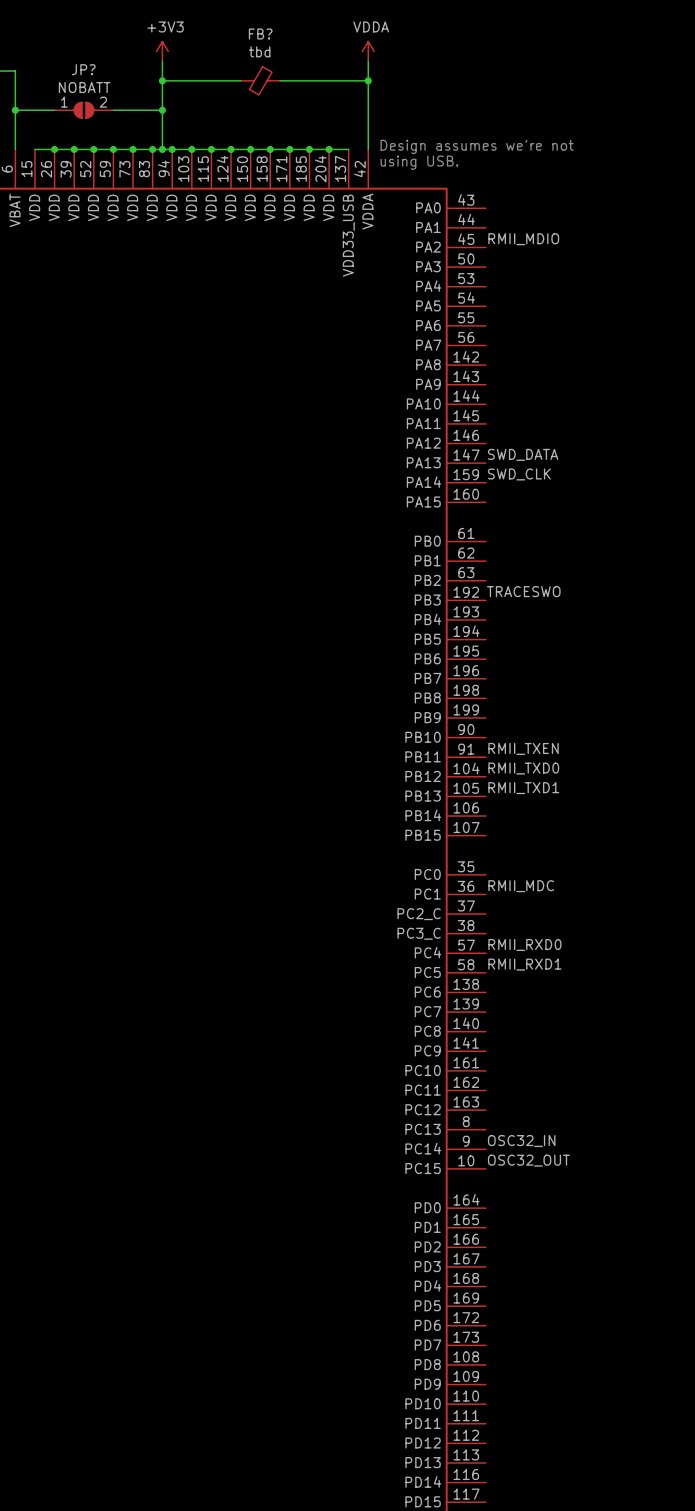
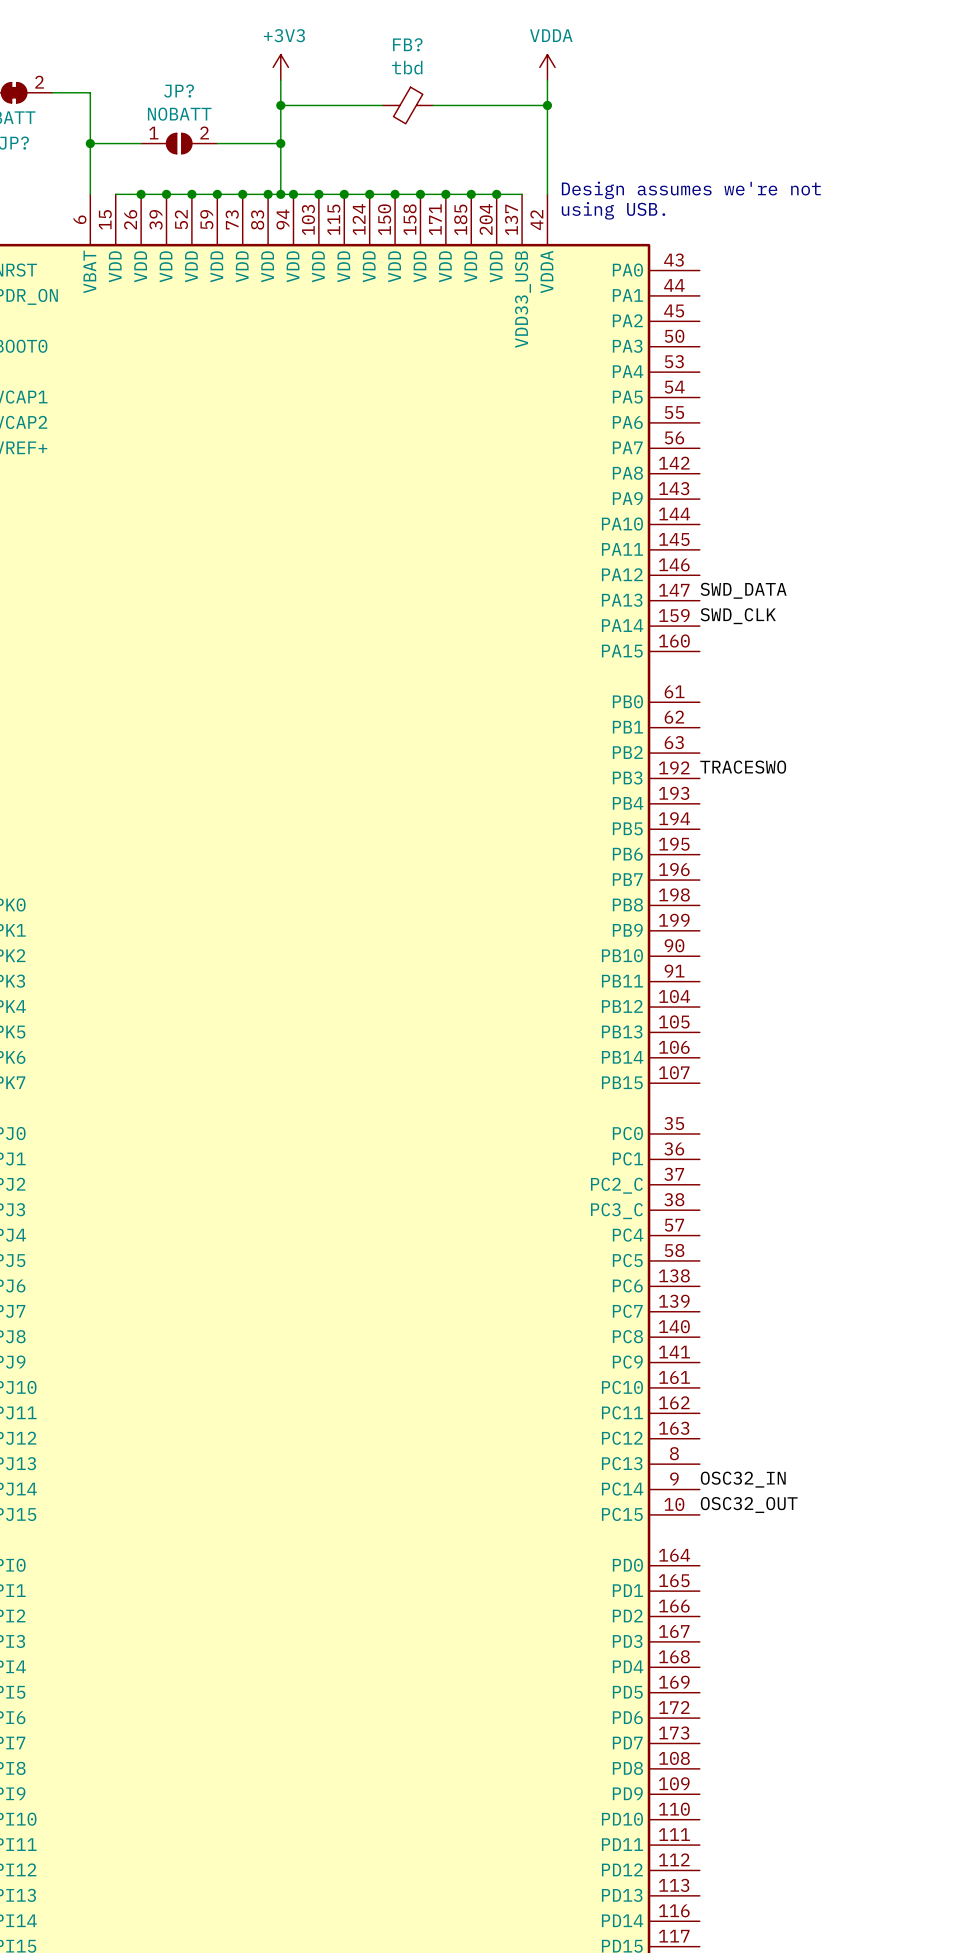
label: RMII_MDIO (523, 239) -> none
label: RMII_TXEN (523, 748) -> none
label: RMII_TXD0 (523, 768) -> none
label: RMII_TXD1 (523, 788) -> none
label: RMII_MDC (521, 886) -> none
label: RMII_RXD0 (524, 944) -> none
label: RMII_RXD1 (524, 964) -> none

